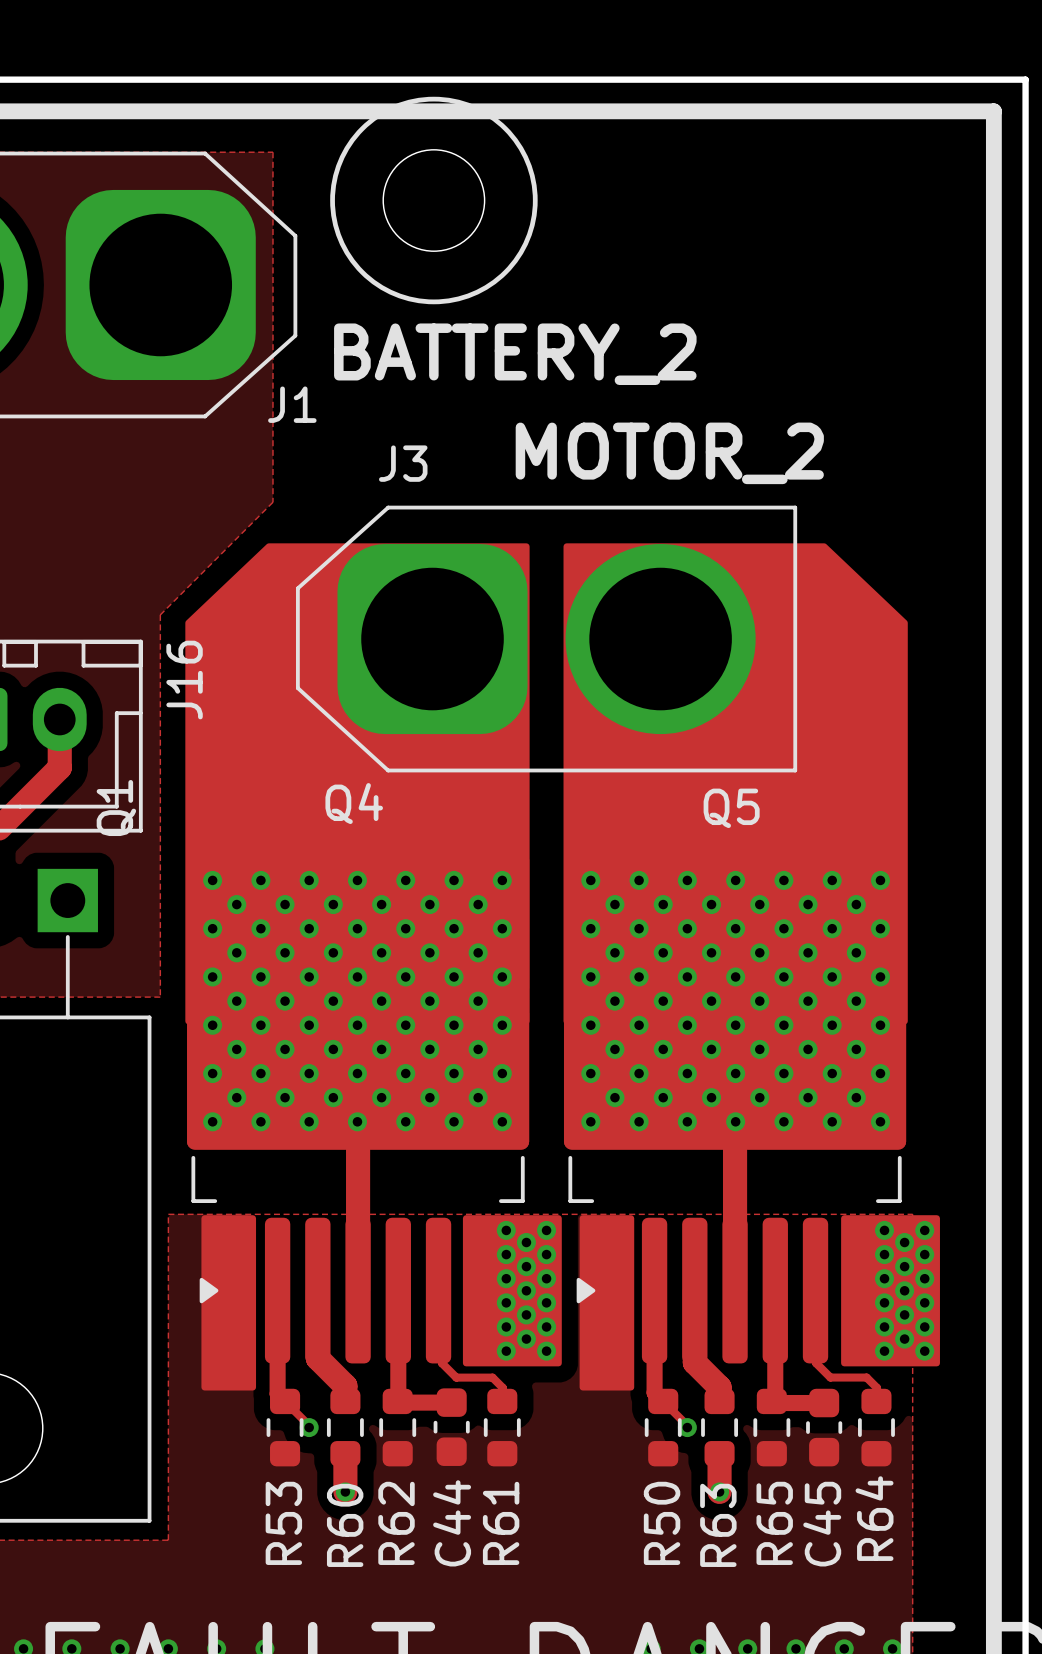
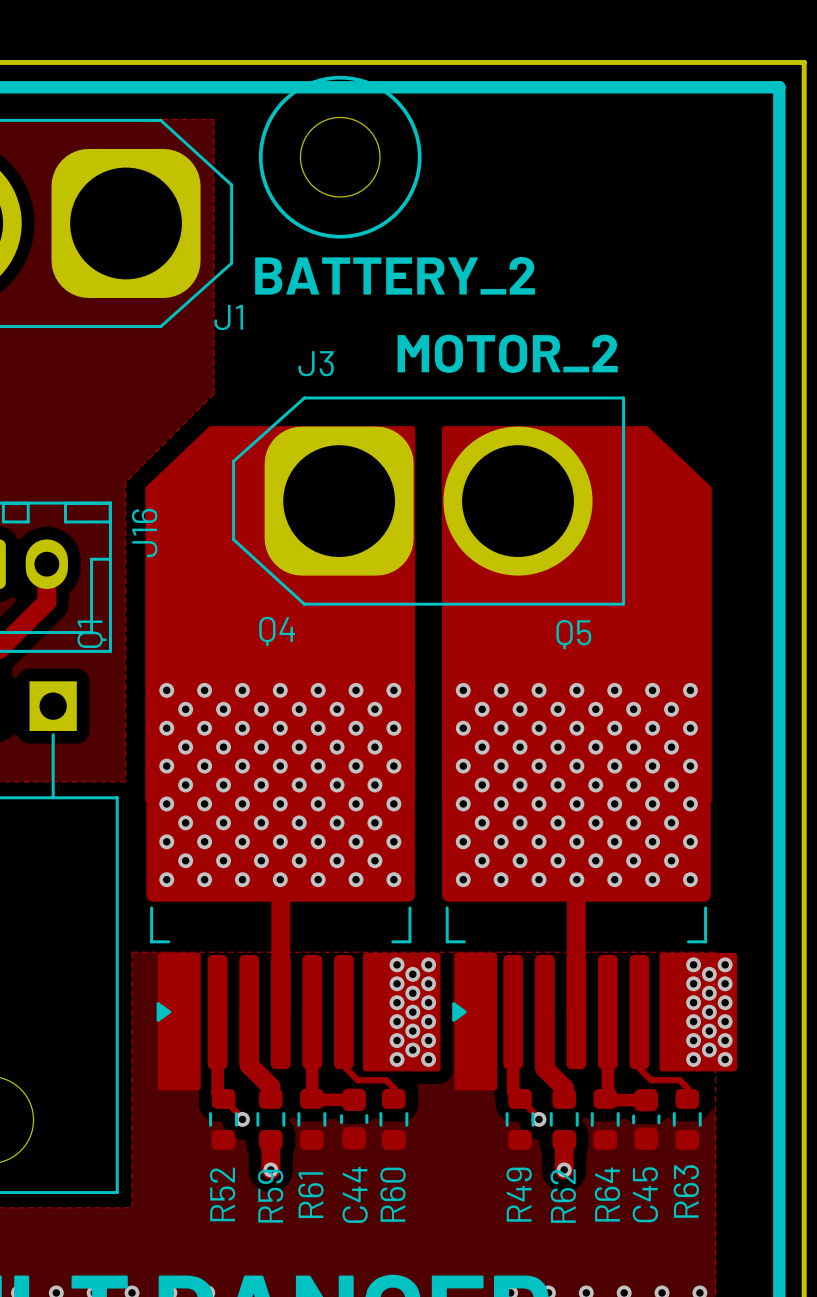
R64 name: R64 (874, 1518) -> R63 (686, 1191)
R53 name: R53 (283, 1523) -> R52 (222, 1194)
R62 name: R62 (396, 1523) -> R61 (310, 1195)
R61 name: R61 (501, 1523) -> R60 (392, 1194)
R50 name: R50 (662, 1523) -> R49 (519, 1194)
R65 name: R65 (774, 1523) -> R64 (607, 1194)
R60 name: R60 (345, 1525) -> R59 (270, 1196)
R63 name: R63 (718, 1525) -> R62 (563, 1196)

